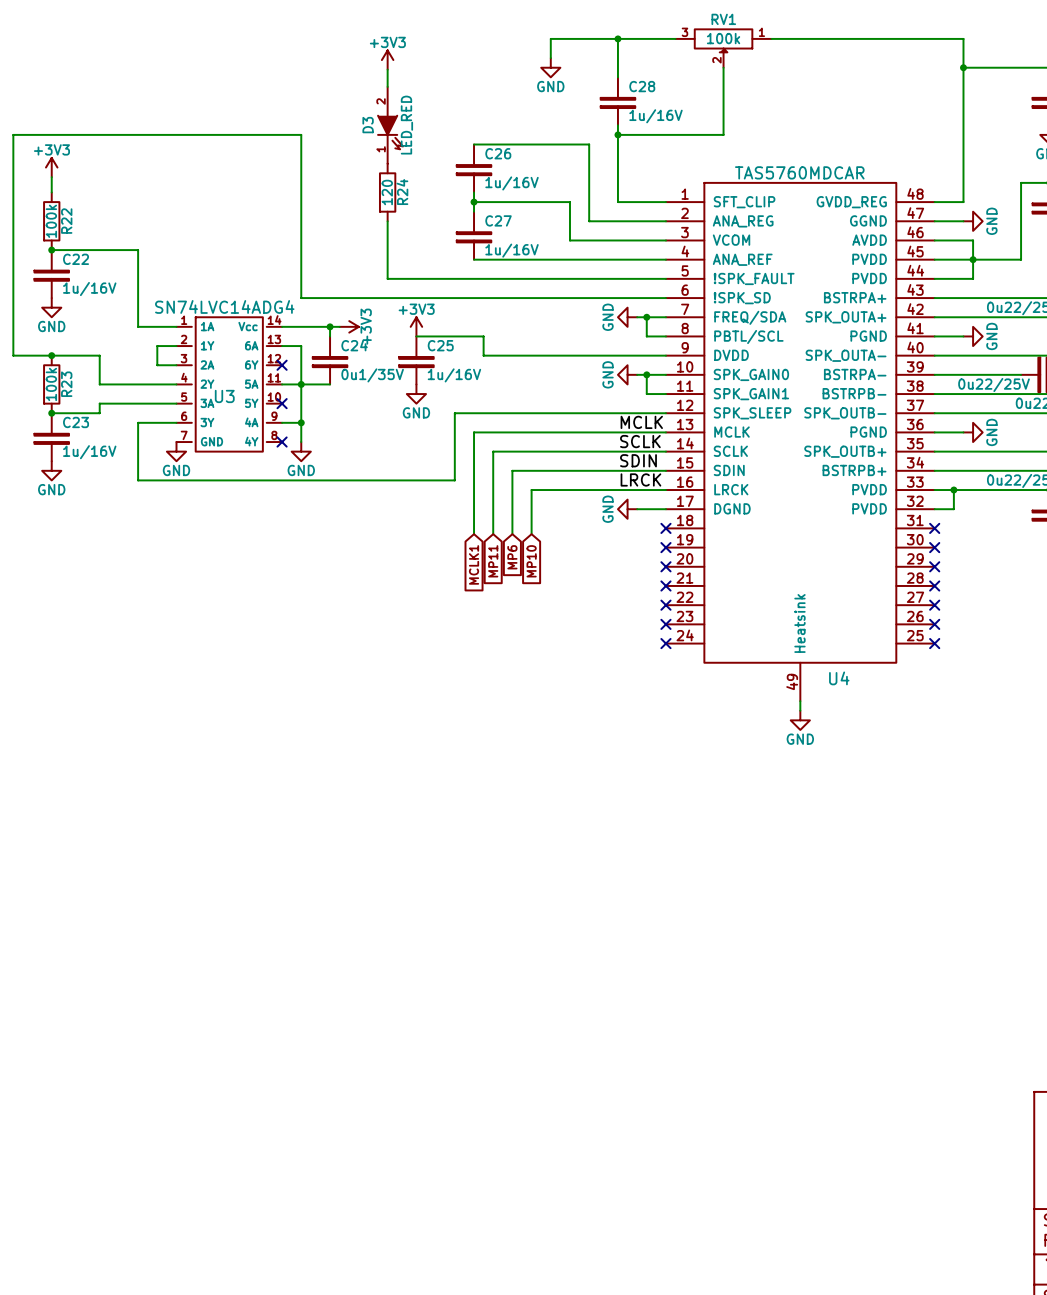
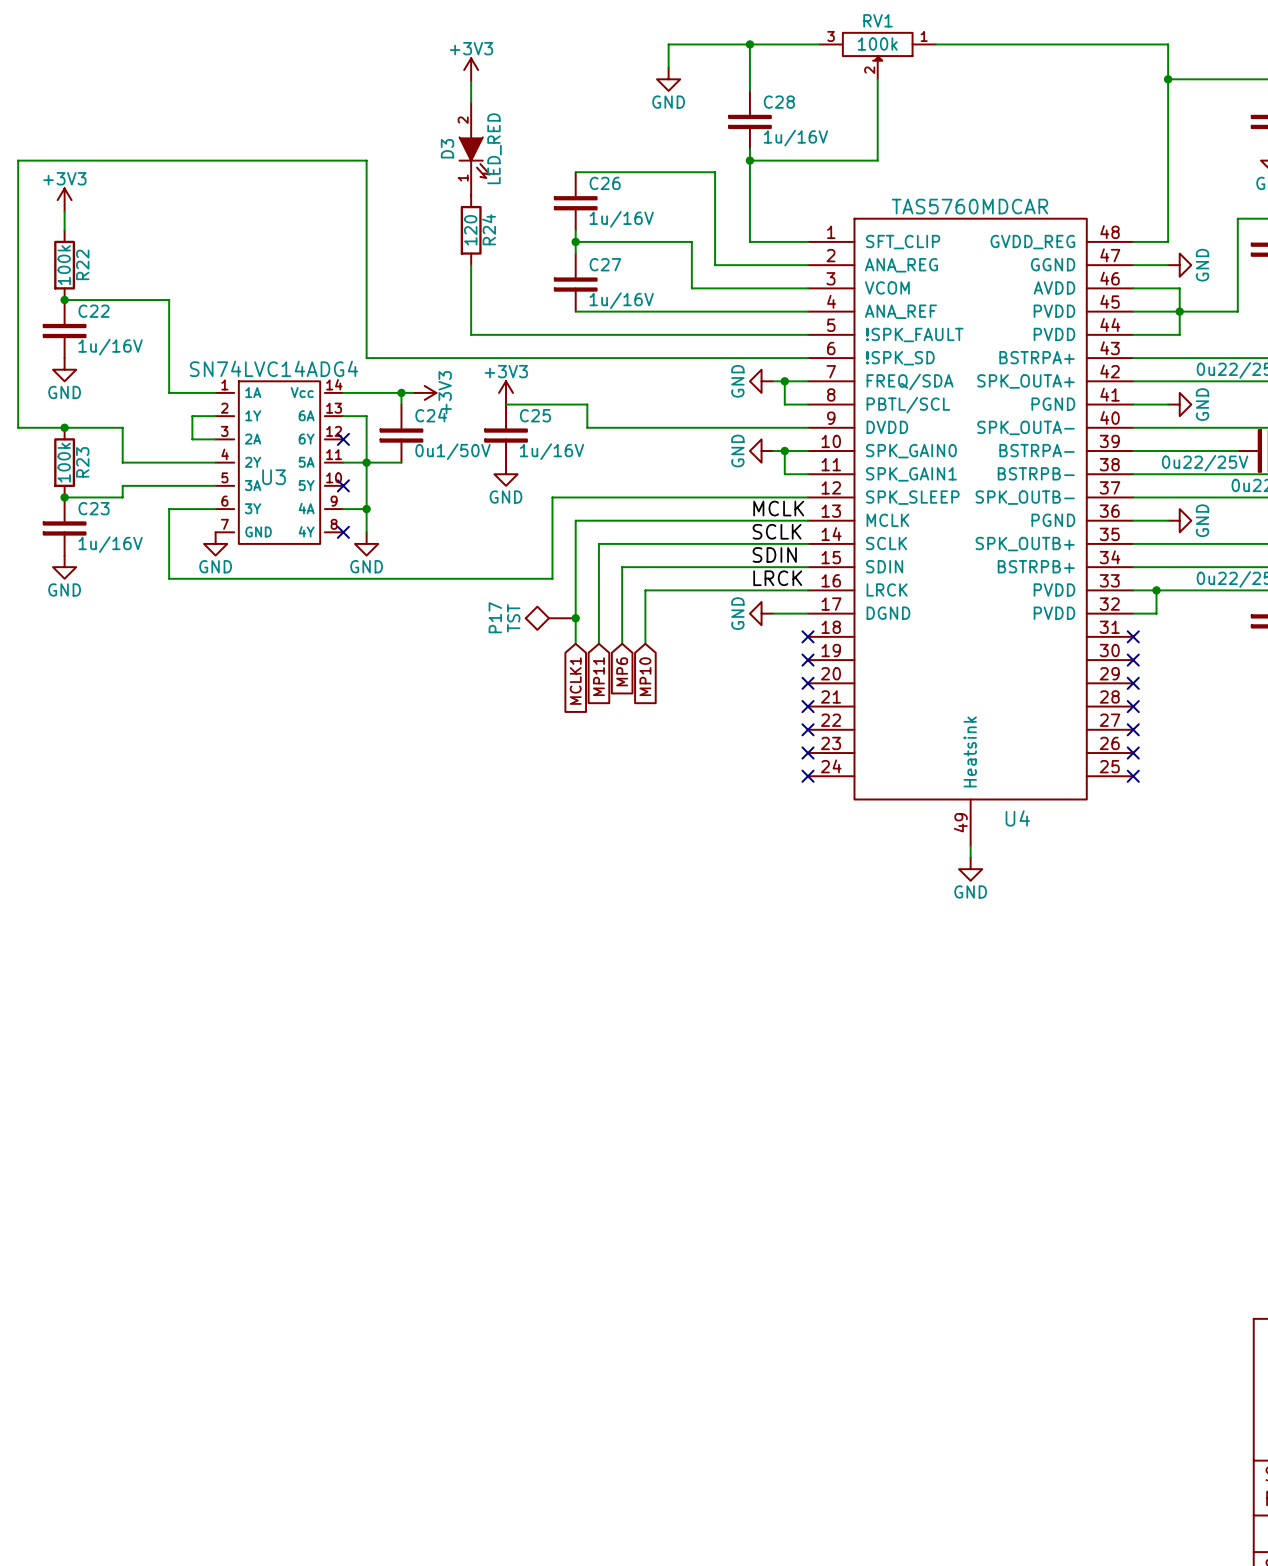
C24 value: 0u1/35V (372, 375) -> 0u1/50V (453, 451)
P17: none -> TST (548, 618)
junction: none -> (575, 618)

